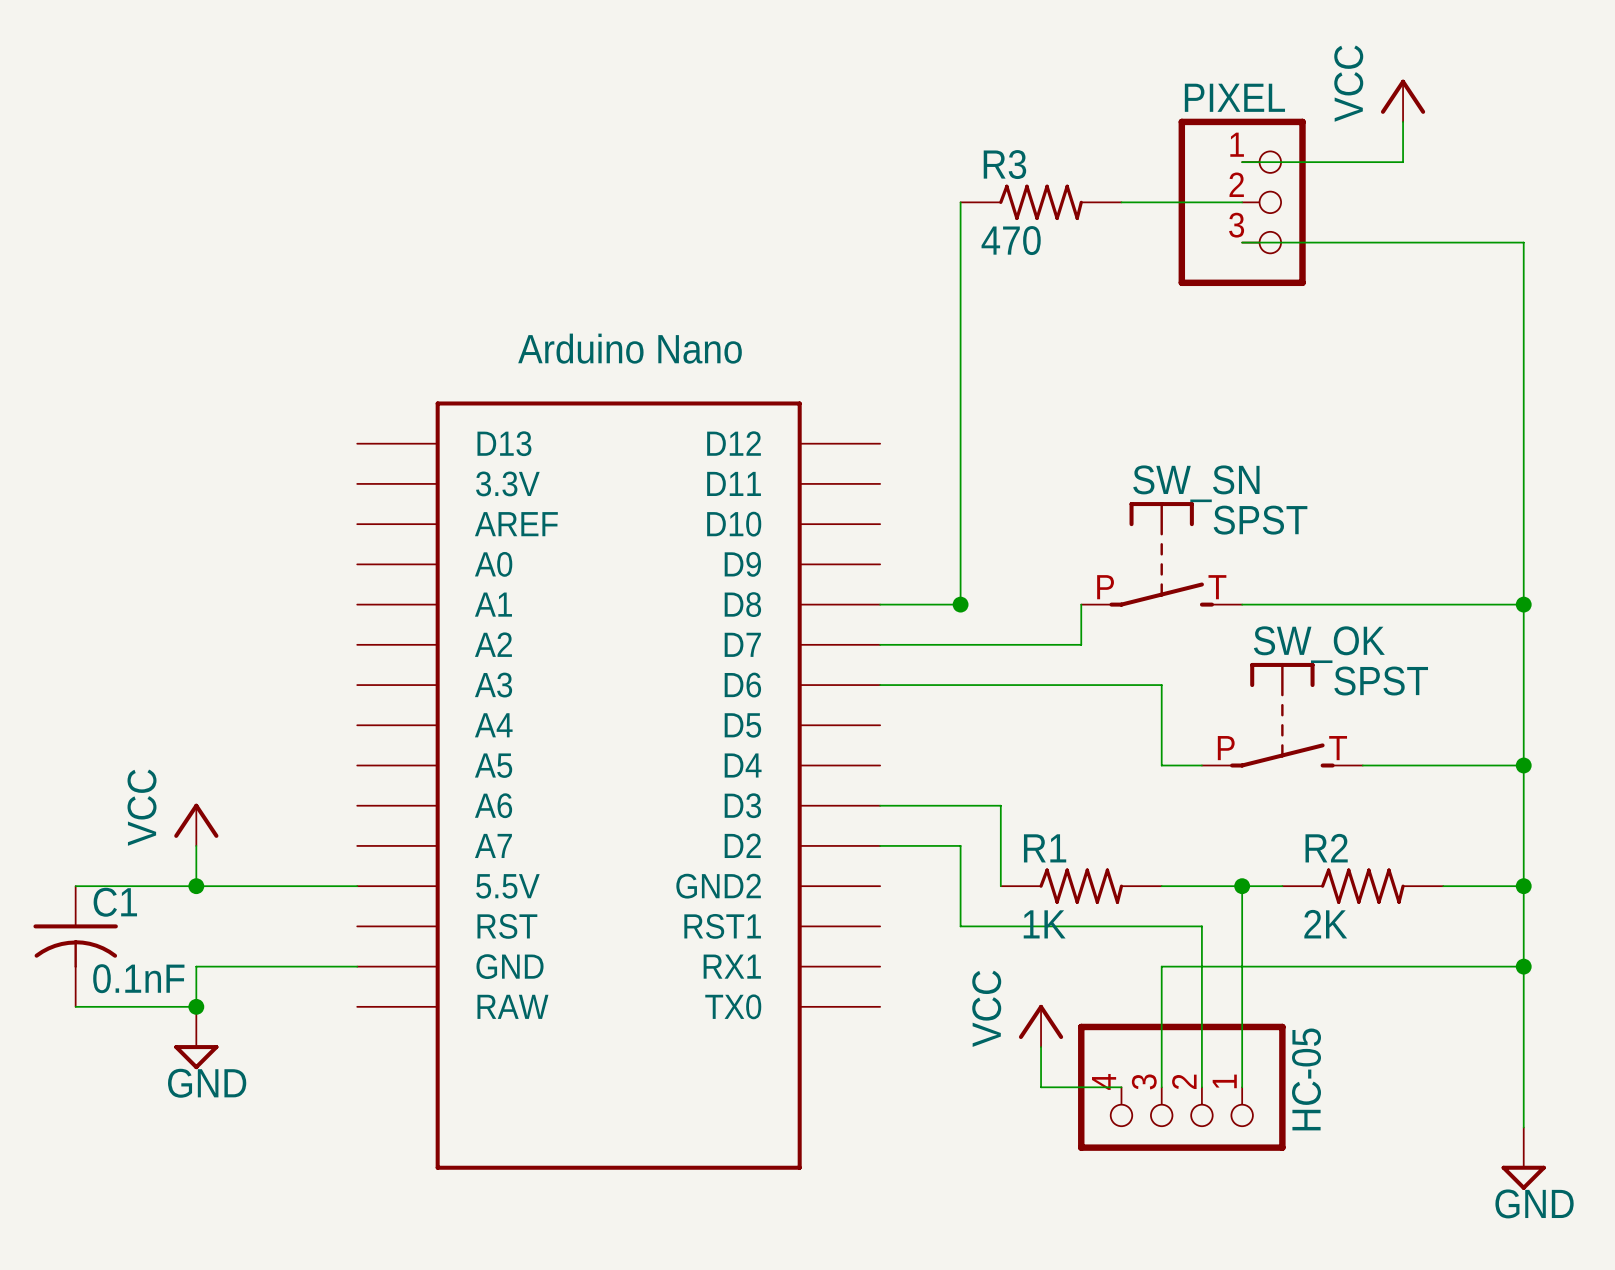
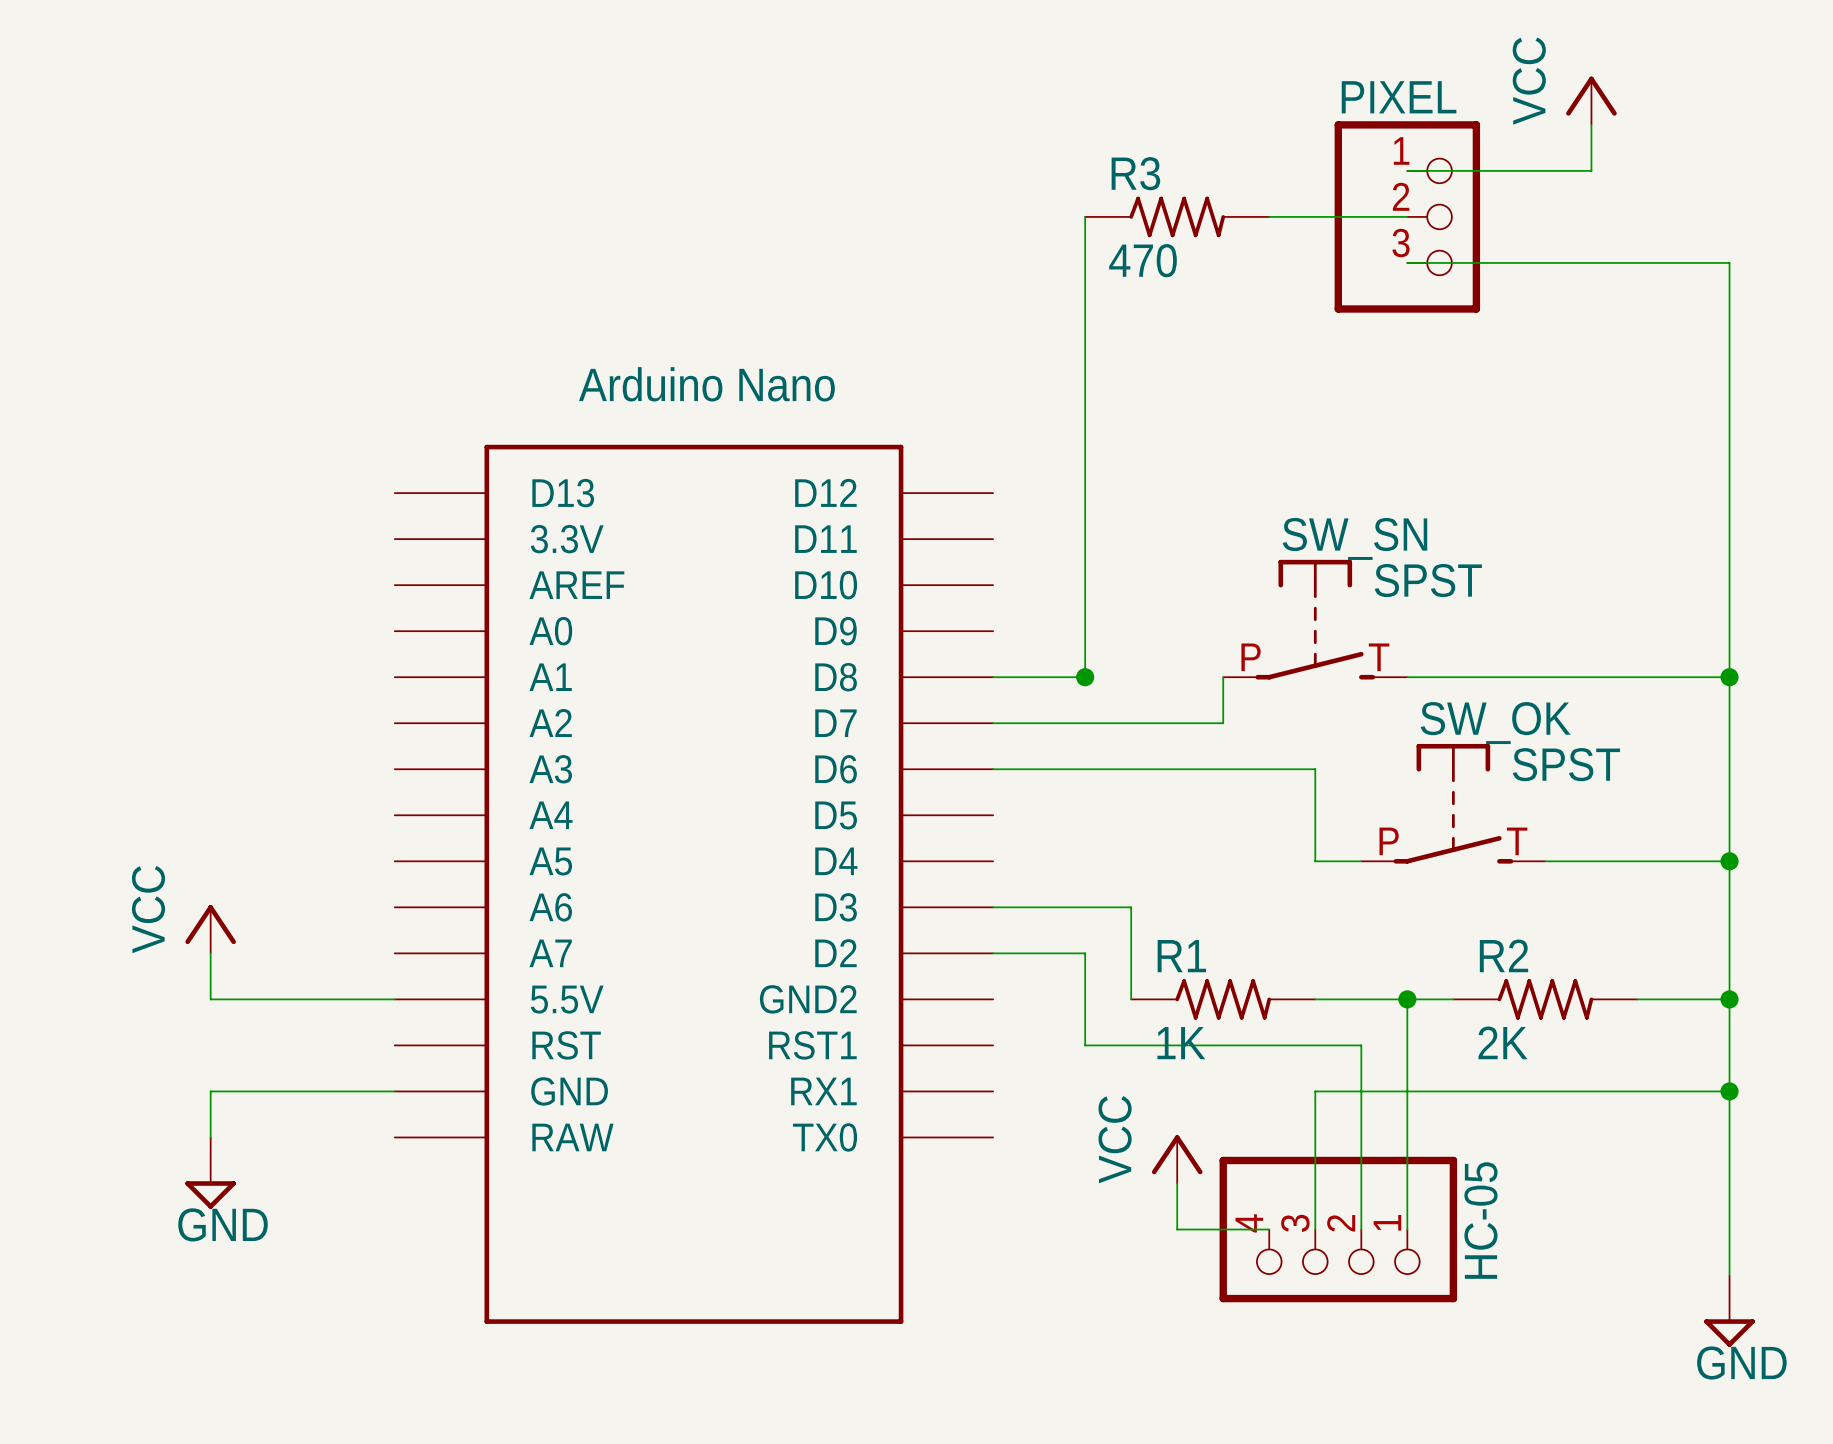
wire: (75, 886) (196, 886) -> none
junction: (196, 886) -> none
C1: 0.1nF (75, 946) -> none
wire: (75, 1006) (196, 1006) -> none
junction: (196, 1006) -> none

